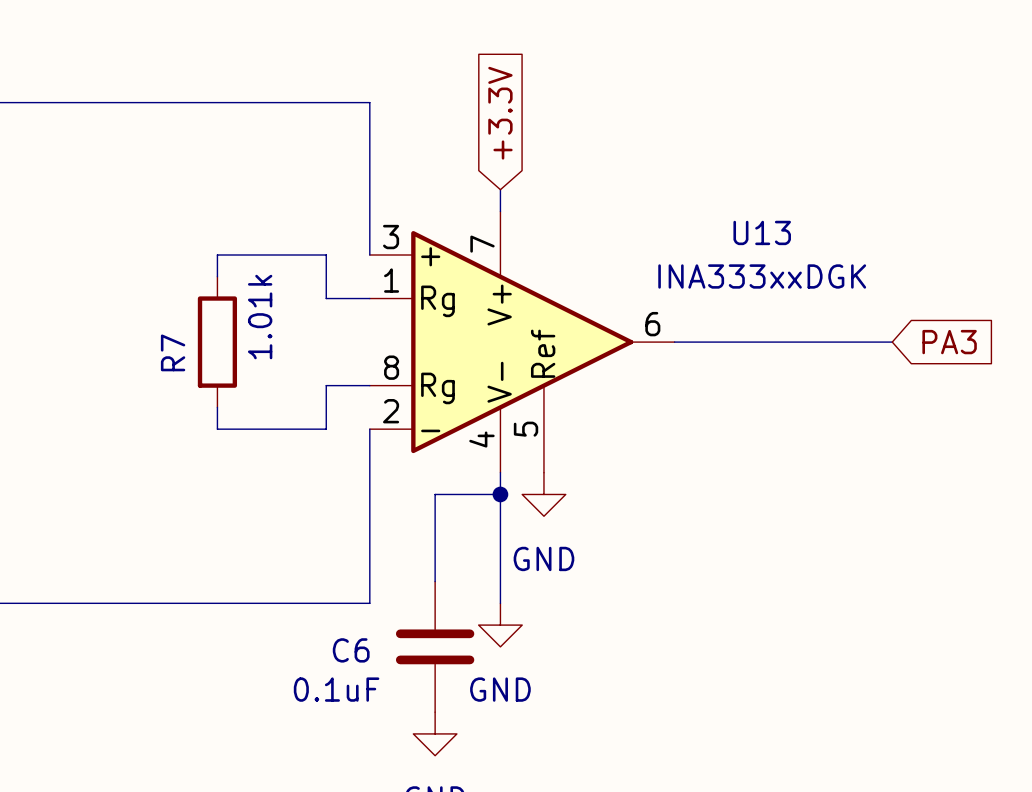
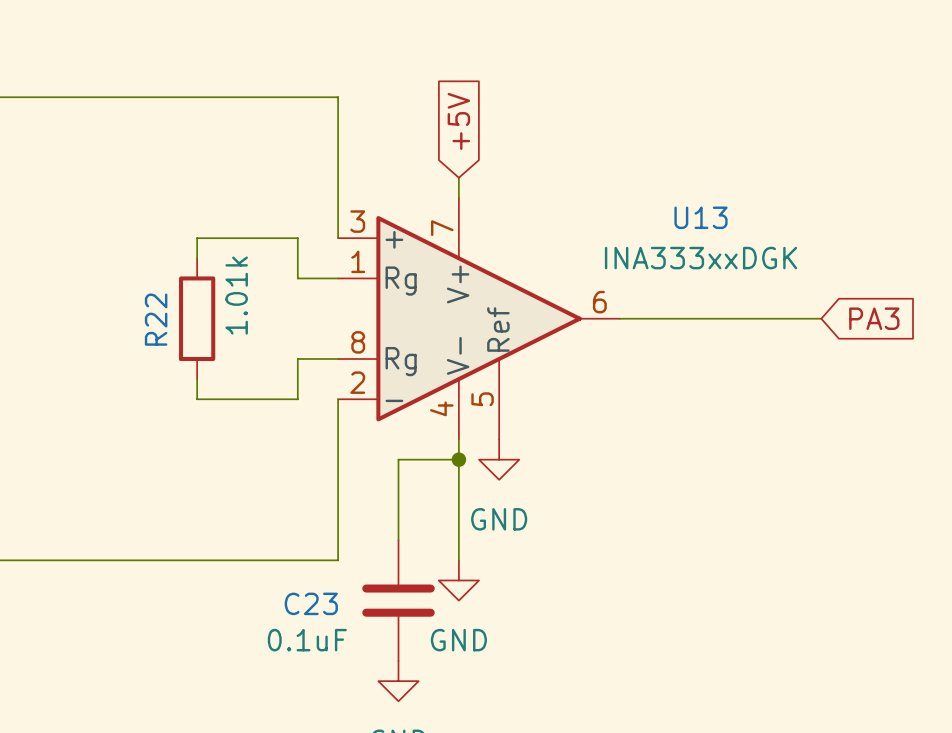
global label: +3.3V (500, 113) -> +5V (458, 121)
R7 name: R7 (173, 352) -> R22 (156, 319)
C6 name: C6 (351, 650) -> C23 (311, 603)

